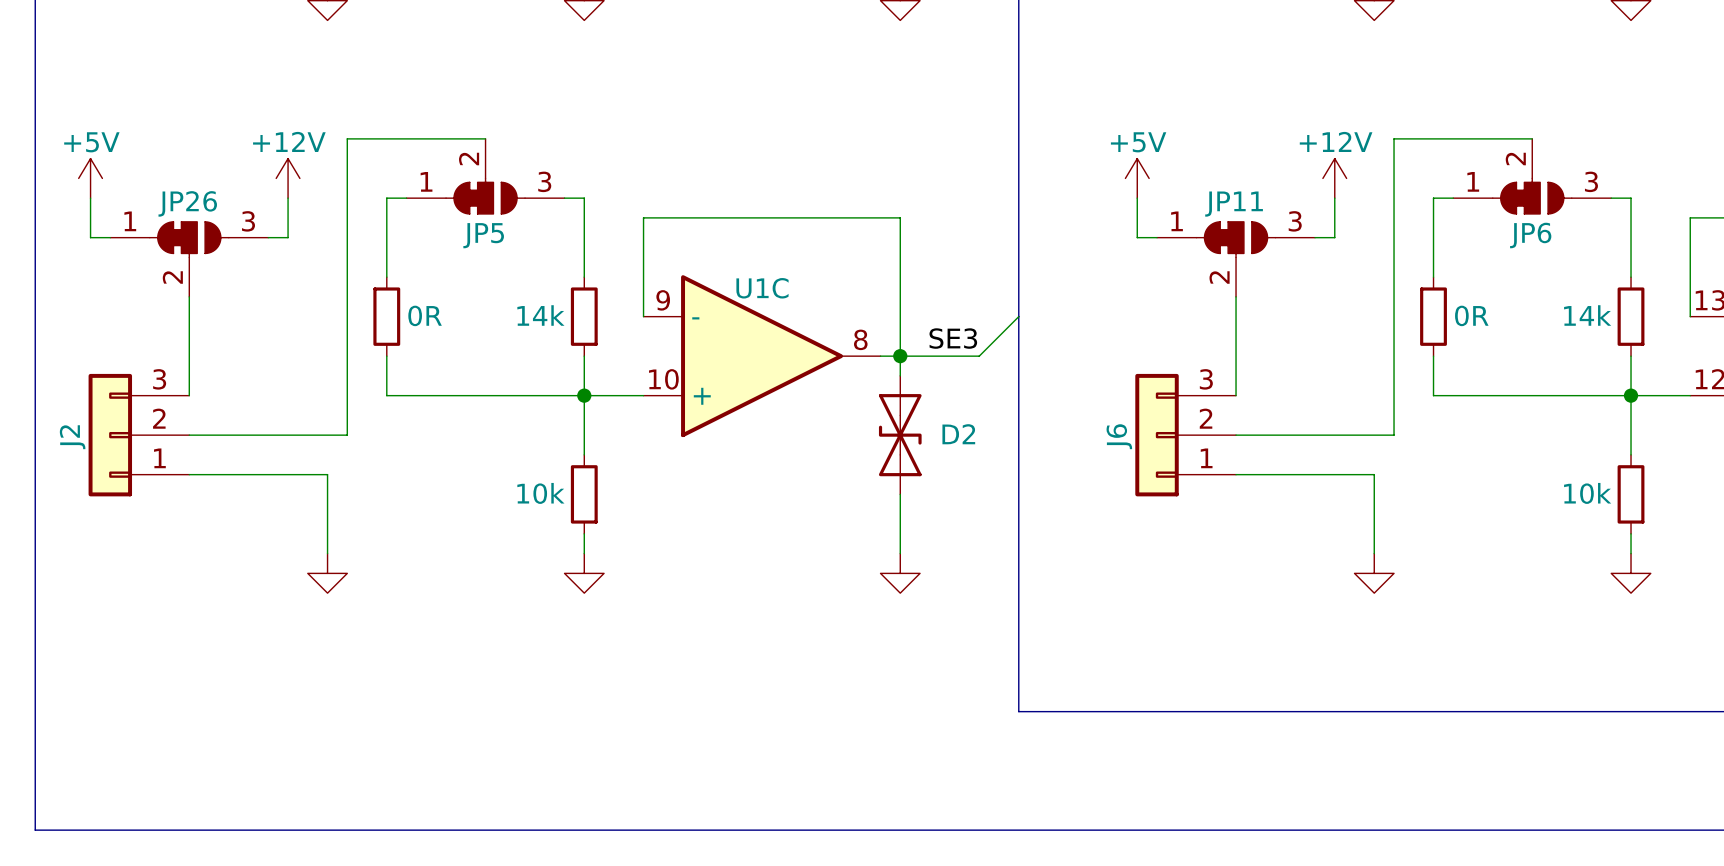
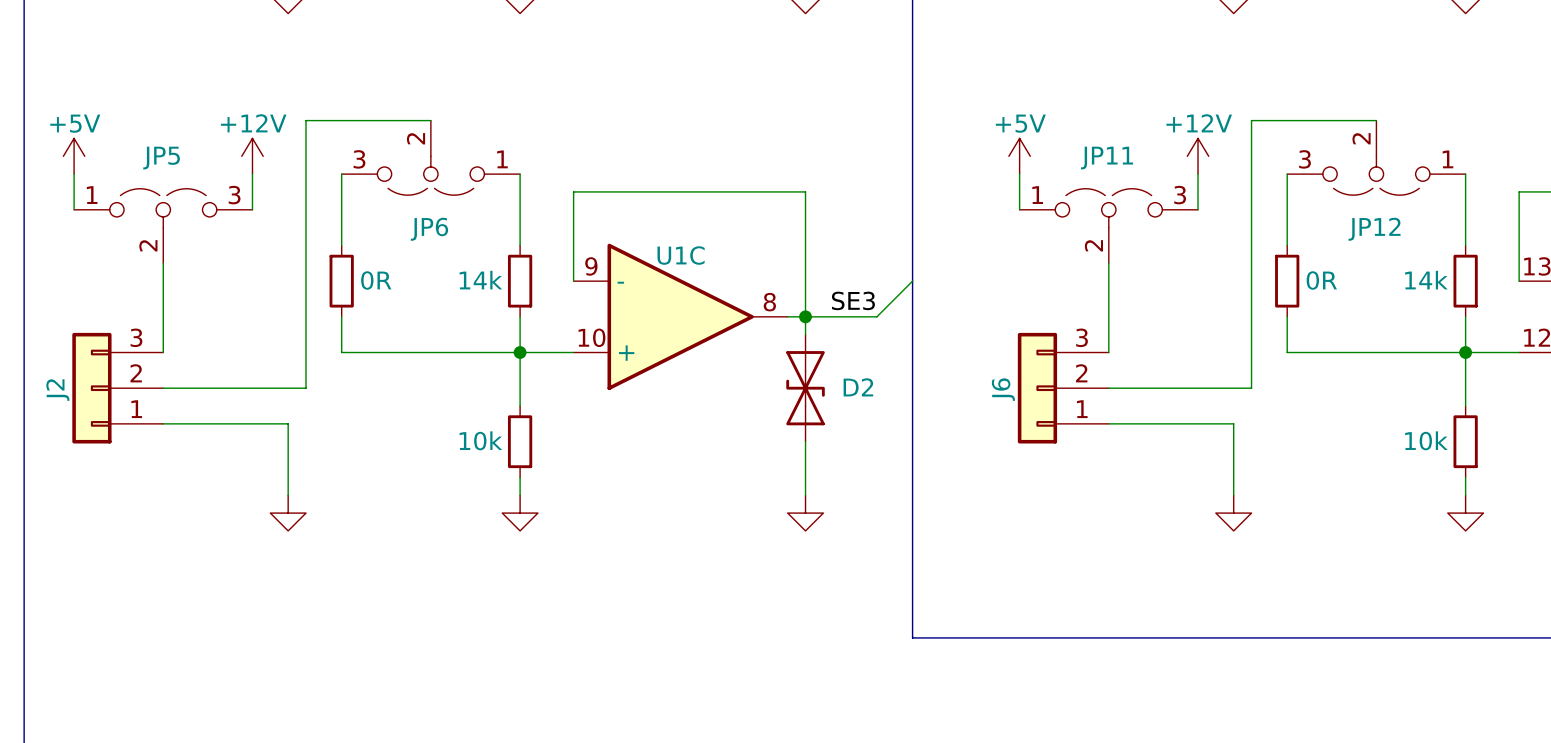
JP5 symbol: [406, 138, 565, 214] -> [74, 188, 253, 264]
JP6 symbol: [1453, 138, 1612, 214] -> [341, 120, 521, 196]
JP12: none -> (1376, 157)
JP11 symbol: [1157, 221, 1316, 297] -> [1019, 188, 1199, 264]
JP5 name position: JP5 (483, 235) -> JP5 (161, 158)
JP26: (189, 259) -> none

